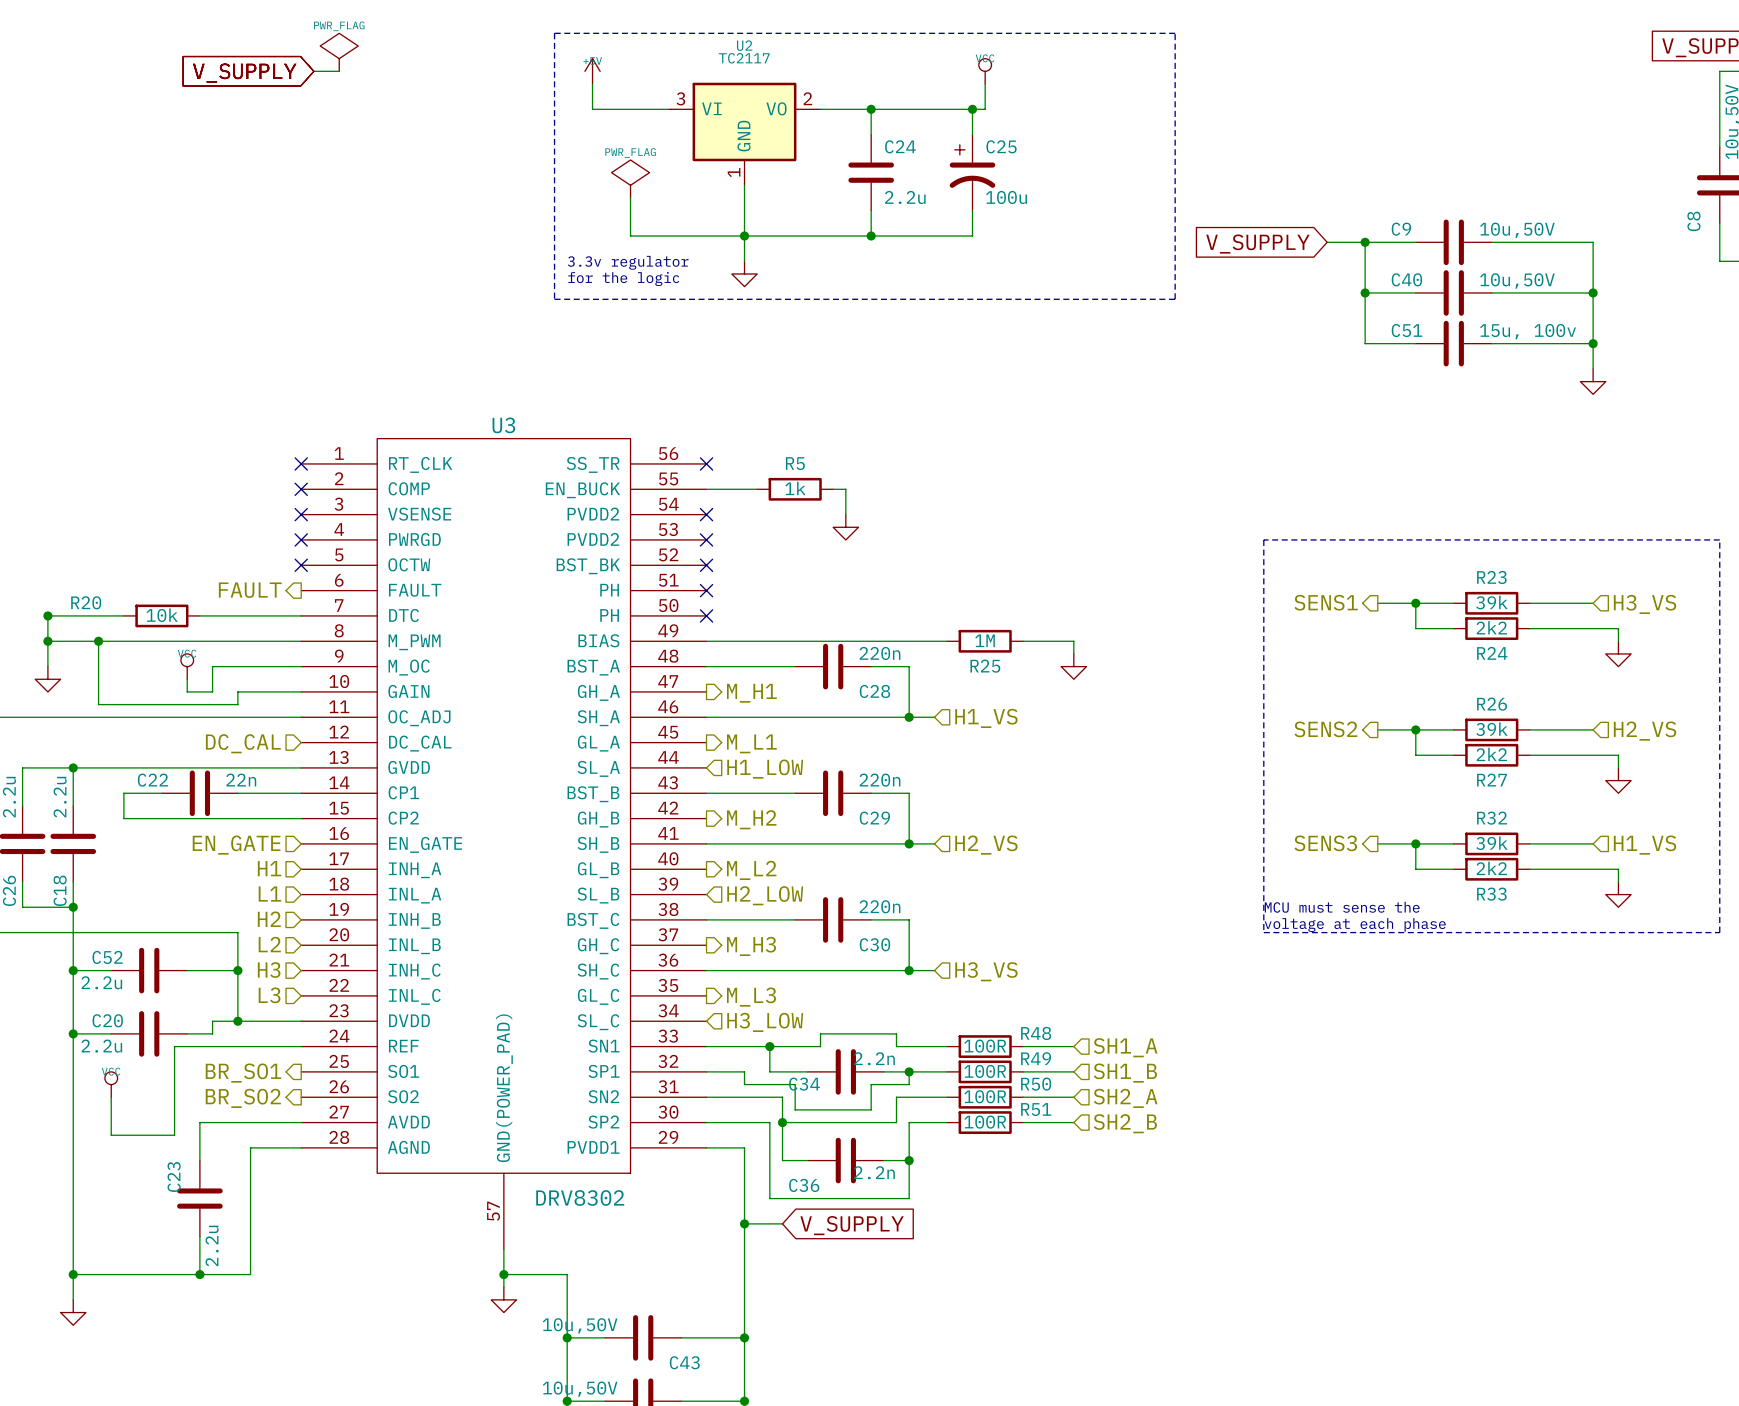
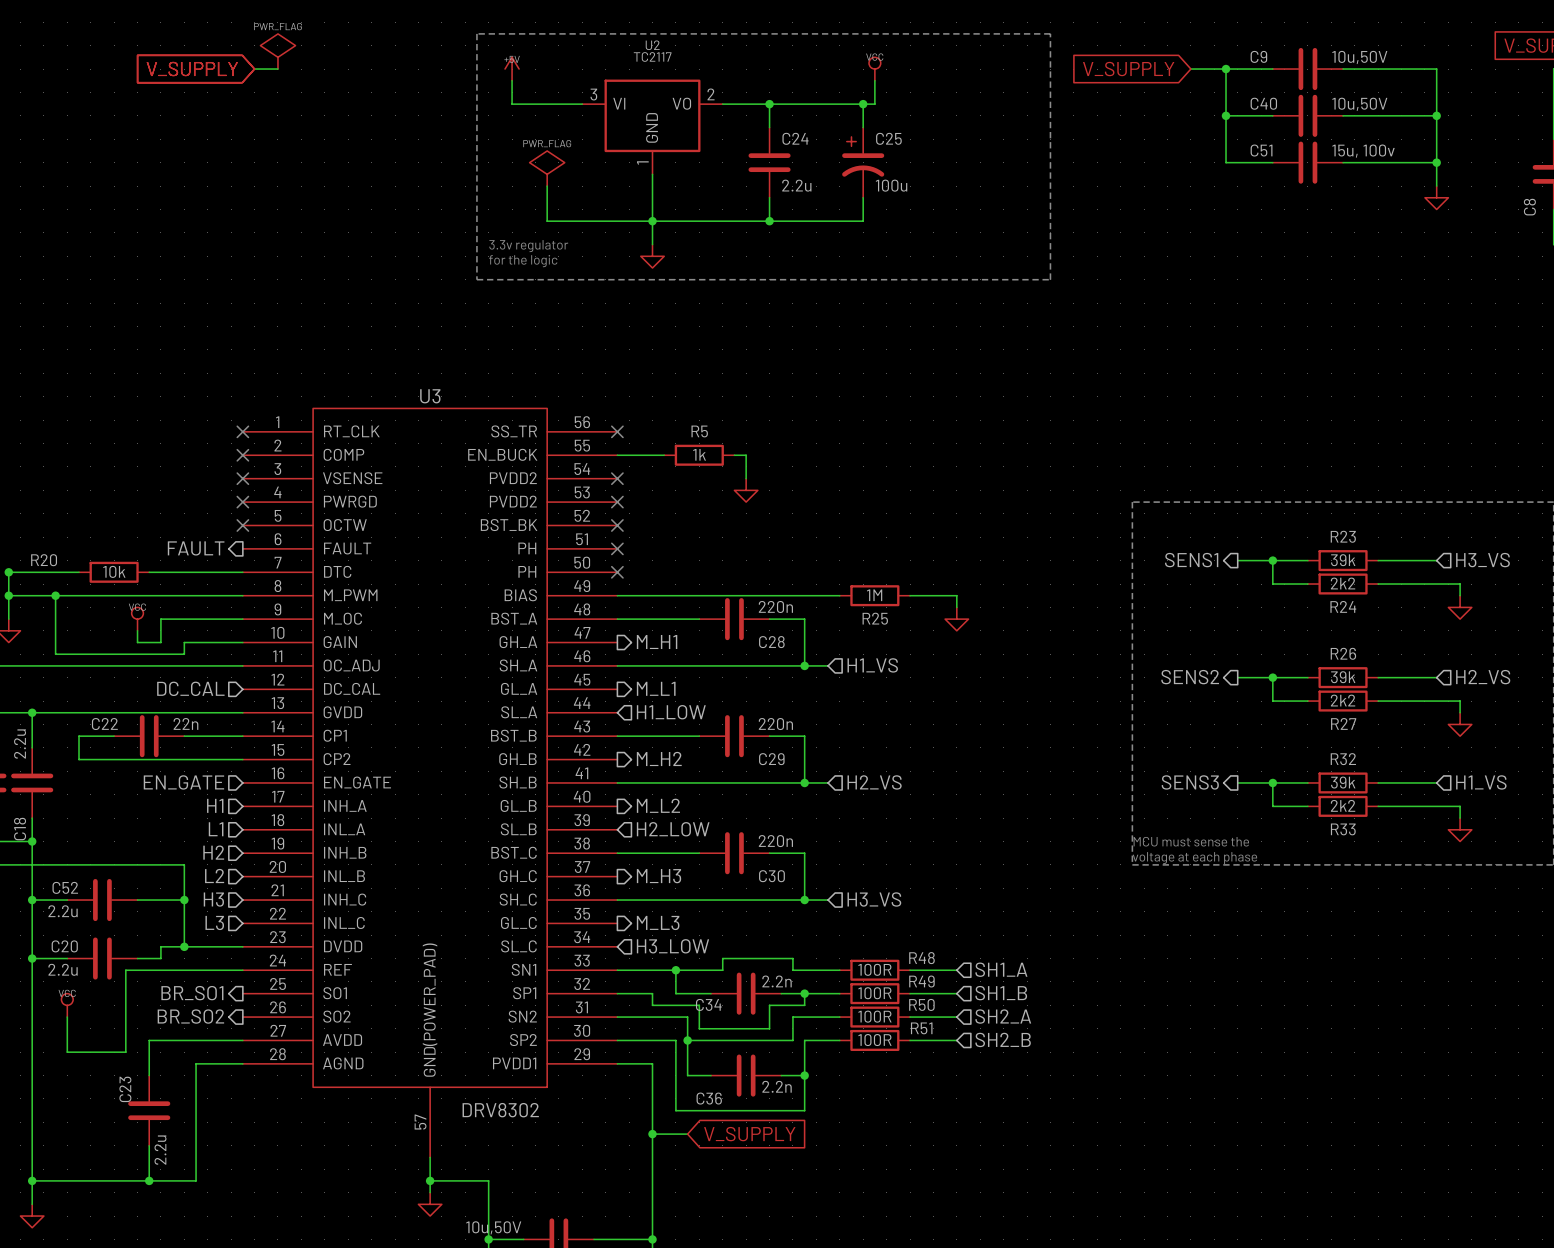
junction: none -> (1226, 69)
junction: none -> (1226, 115)
junction: none -> (1436, 115)
junction: none -> (1436, 162)
wire: (1327, 242) (1415, 242) -> (1190, 69) (1272, 69)
wire: (1365, 242) (1365, 343) (1415, 343) -> (1226, 69) (1226, 162) (1272, 162)
junction: (1365, 242) -> none
C9 position: (1453, 242) -> (1307, 69)
wire: (1491, 242) (1593, 242) (1593, 368) -> (1343, 69) (1436, 69) (1436, 186)
global label position: V_SUPPLY (1257, 244) -> V_SUPPLY (1128, 69)
wire: (1365, 292) (1415, 292) -> (1226, 115) (1272, 115)
junction: (1365, 292) -> none
C40 position: (1453, 292) -> (1307, 115)
wire: (1491, 292) (1593, 292) -> (1343, 115) (1436, 115)
junction: (1593, 292) -> none
C51 position: (1453, 343) -> (1307, 162)
wire: (1491, 343) (1593, 343) -> (1343, 162) (1436, 162)
junction: (1593, 343) -> none
power symbol position: (1593, 381) -> (1436, 197)

